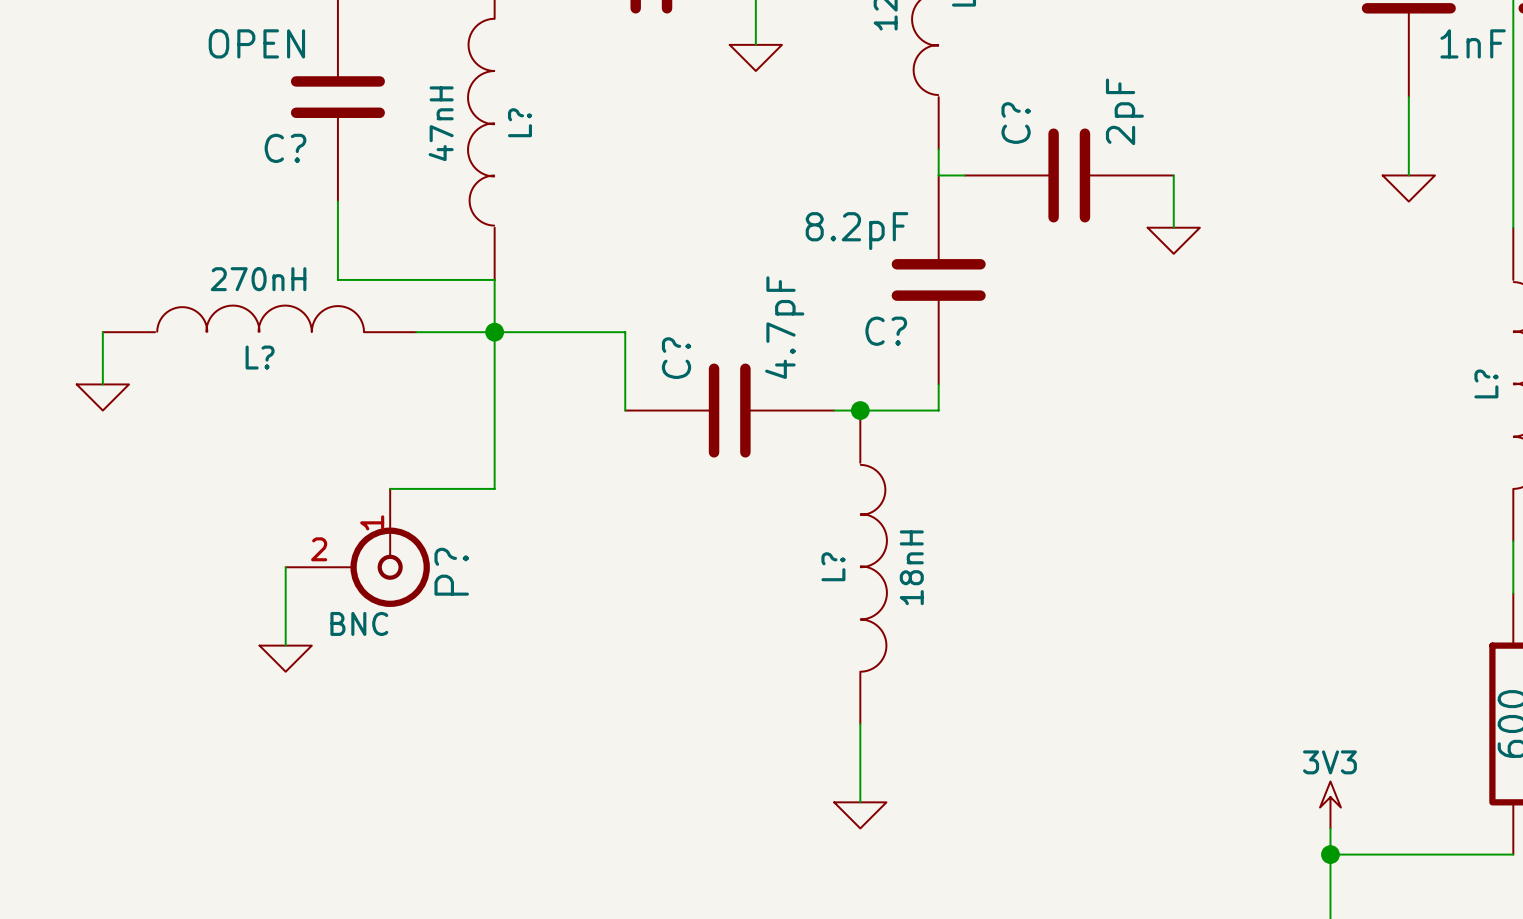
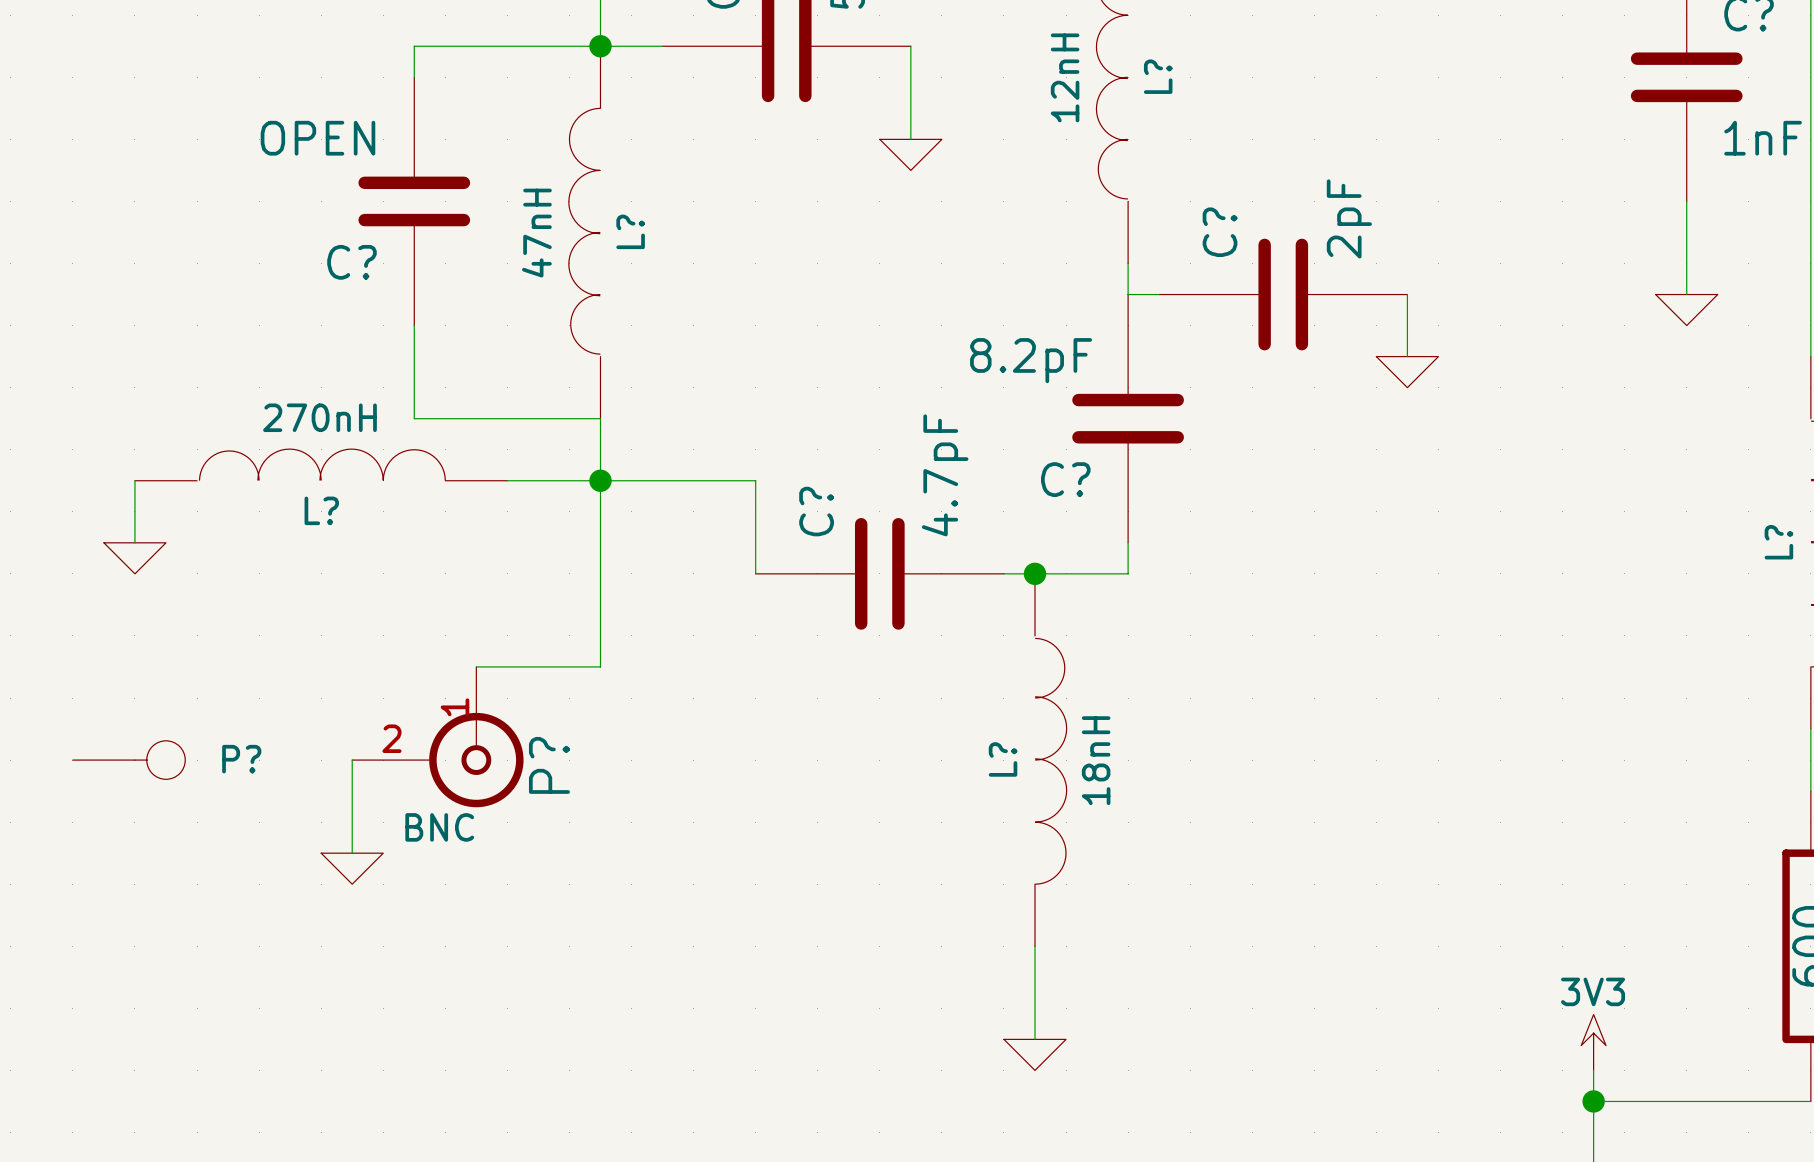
P?: none -> (129, 760)

